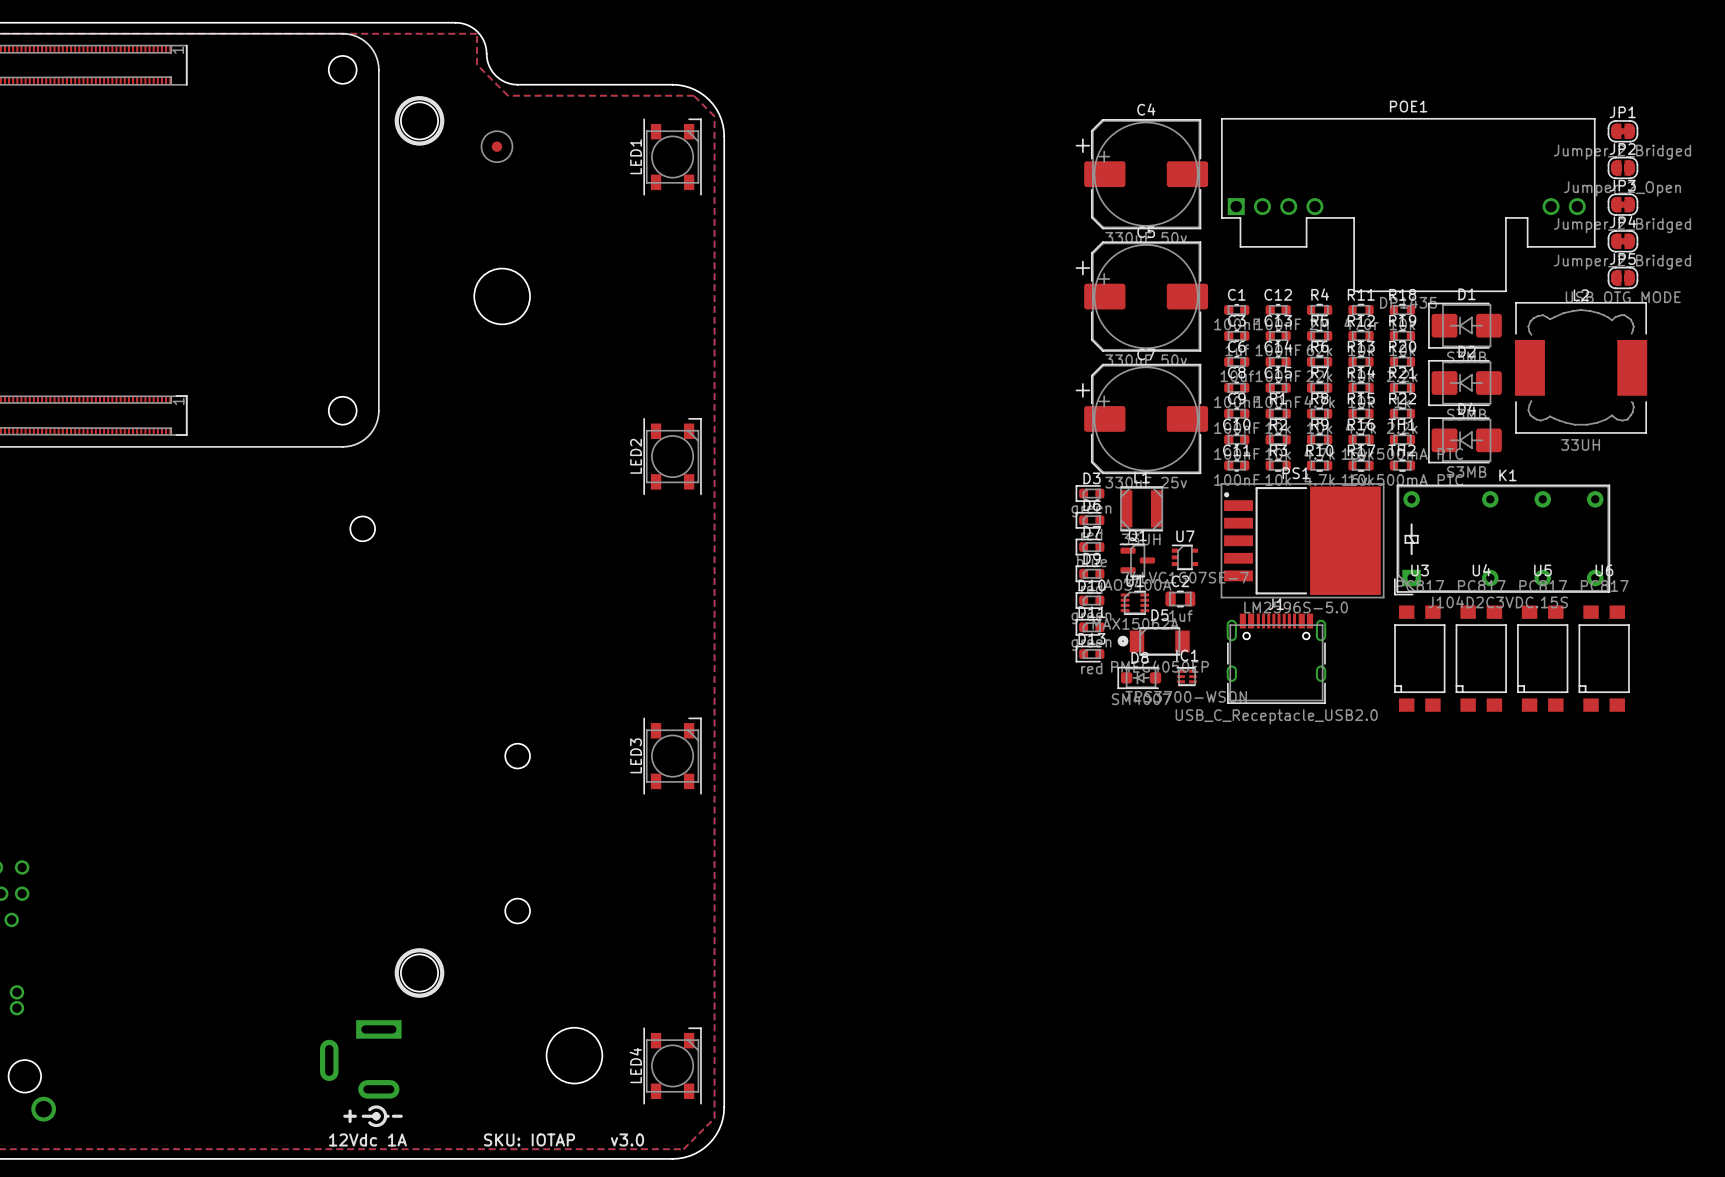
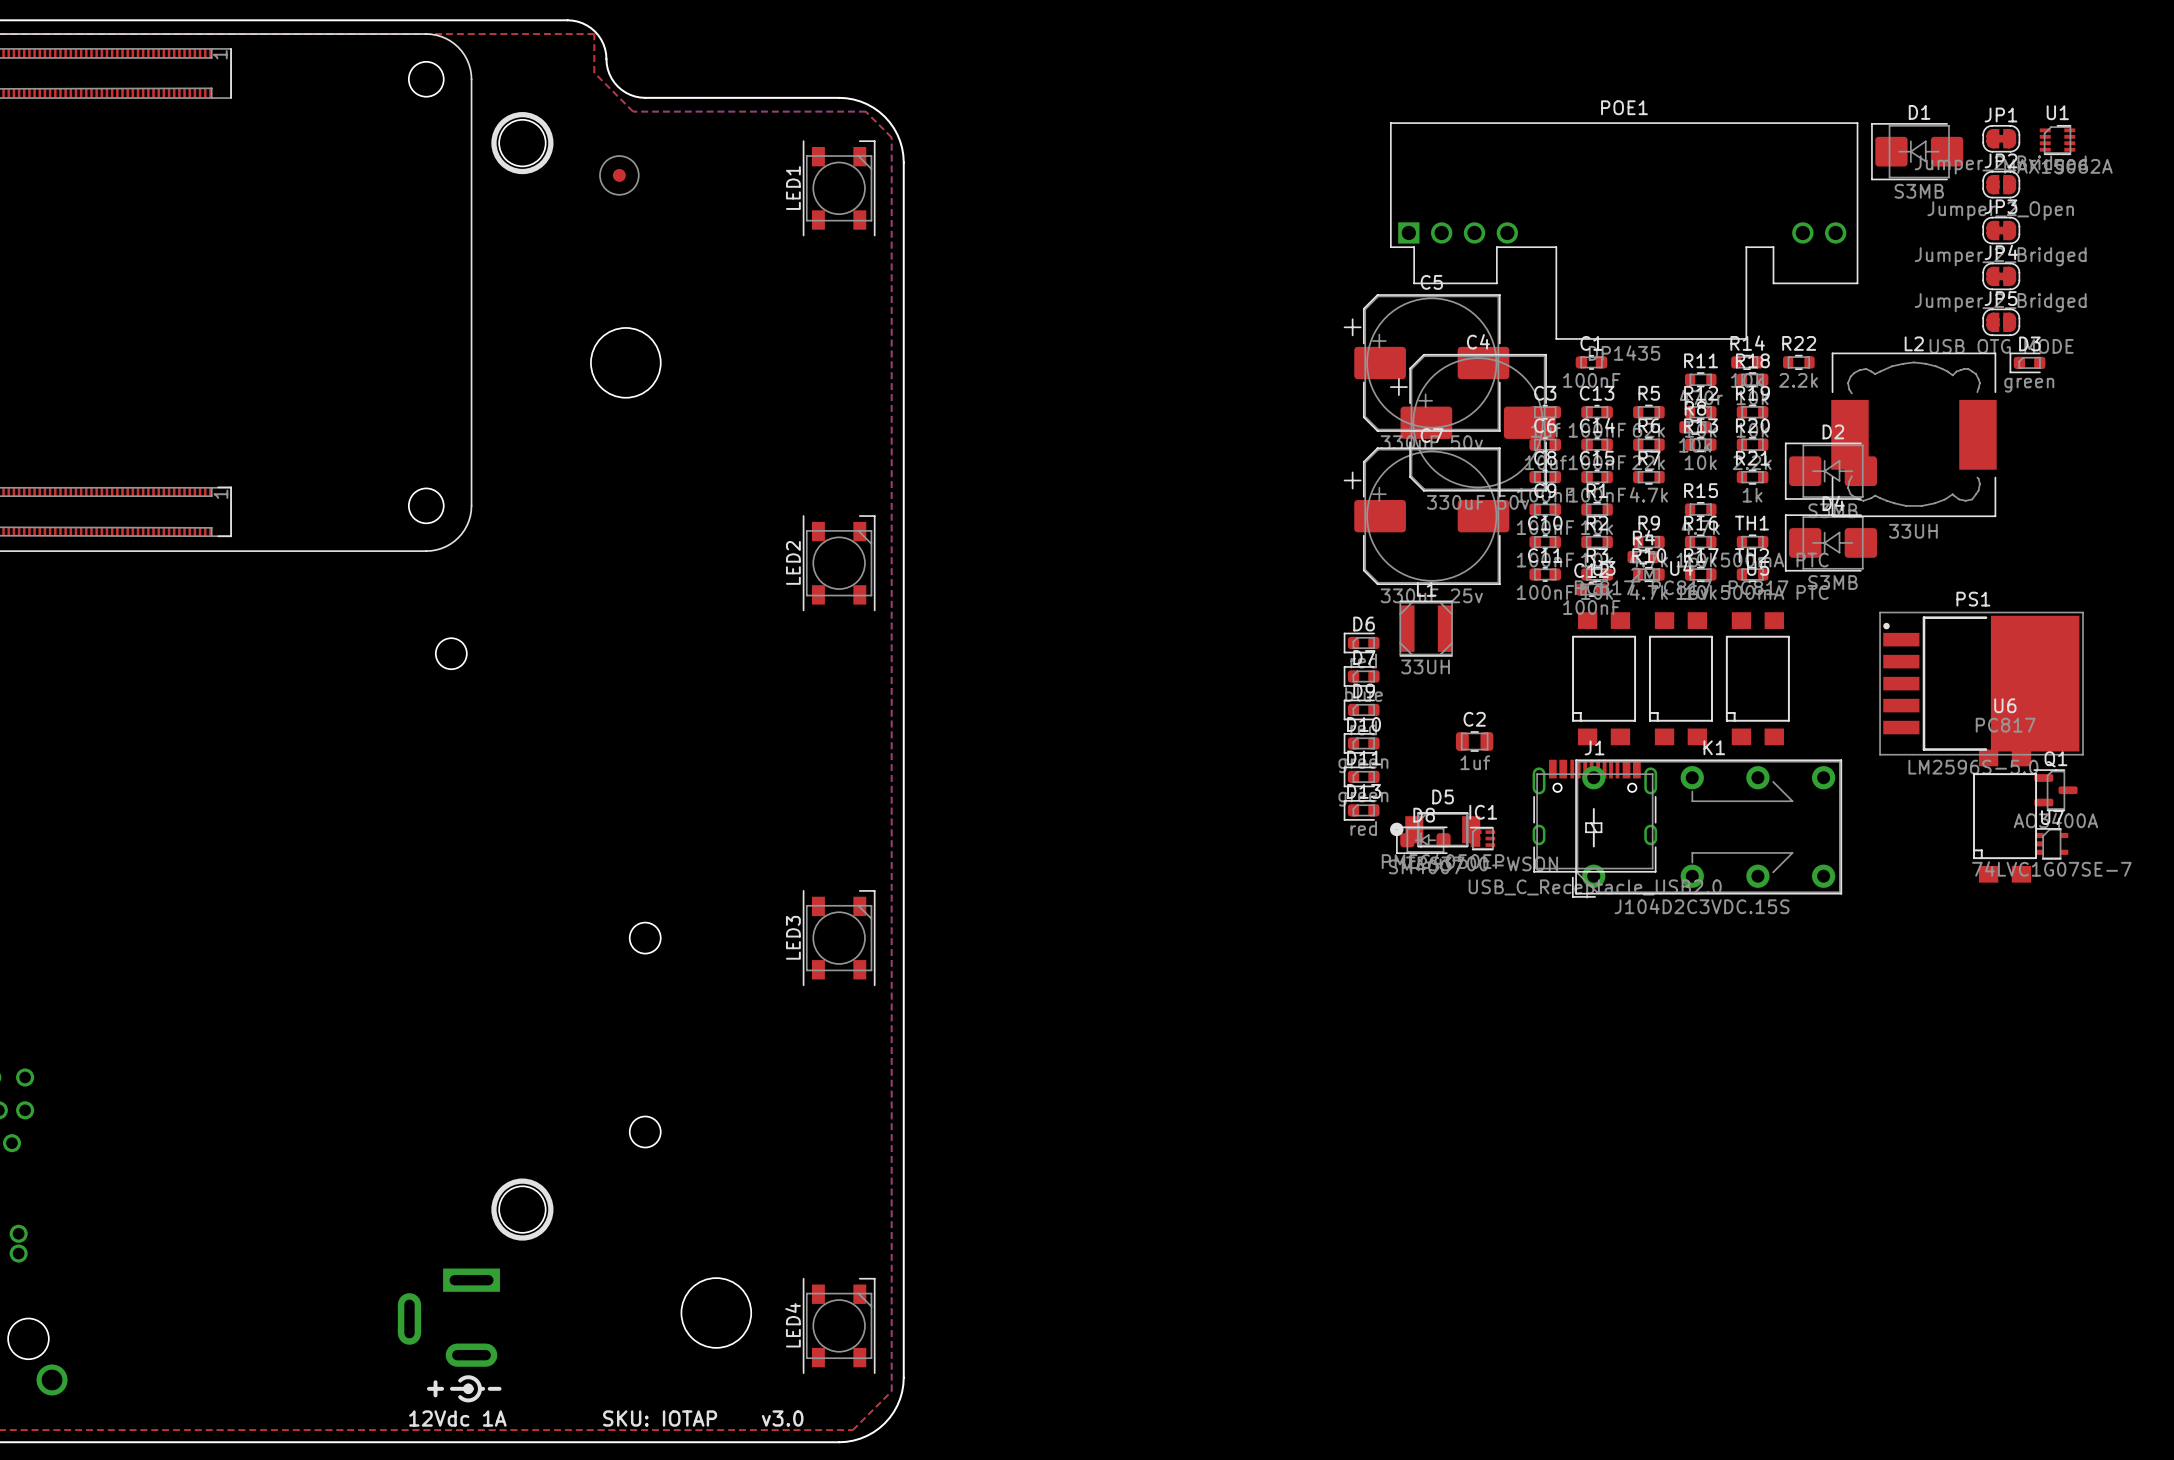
JP1 position: (1622, 131) -> (2001, 138)
JP2 position: (1622, 167) -> (2001, 184)
C4 position: (1141, 174) -> (1472, 422)
JP3 position: (1622, 204) -> (2001, 230)
POE1 position: (1408, 205) -> (1624, 231)
JP4 position: (1622, 241) -> (2001, 276)
JP5 position: (1622, 277) -> (2001, 322)
C1 position: (1236, 309) -> (1591, 362)
C12 position: (1278, 309) -> (1591, 589)
R4 position: (1319, 309) -> (1643, 557)
D1 position: (1465, 325) -> (1917, 151)
L2 position: (1581, 367) -> (1913, 434)
R14 position: (1361, 387) -> (1747, 362)
R8 position: (1319, 413) -> (1695, 427)
R22 position: (1402, 413) -> (1798, 362)
K1 footprint: [1394, 484, 1611, 596] -> [1572, 759, 1843, 898]
D3 position: (1090, 493) -> (2027, 362)
PS1 position: (1302, 540) -> (1981, 683)
U7 position: (1184, 557) -> (2051, 843)
Q1 position: (1137, 560) -> (2055, 790)
U1 position: (1134, 602) -> (2057, 140)
D5 position: (1153, 641) -> (1435, 829)
U3 position: (1419, 658) -> (1604, 678)
U4 position: (1481, 658) -> (1680, 678)
U5 position: (1542, 658) -> (1757, 678)

